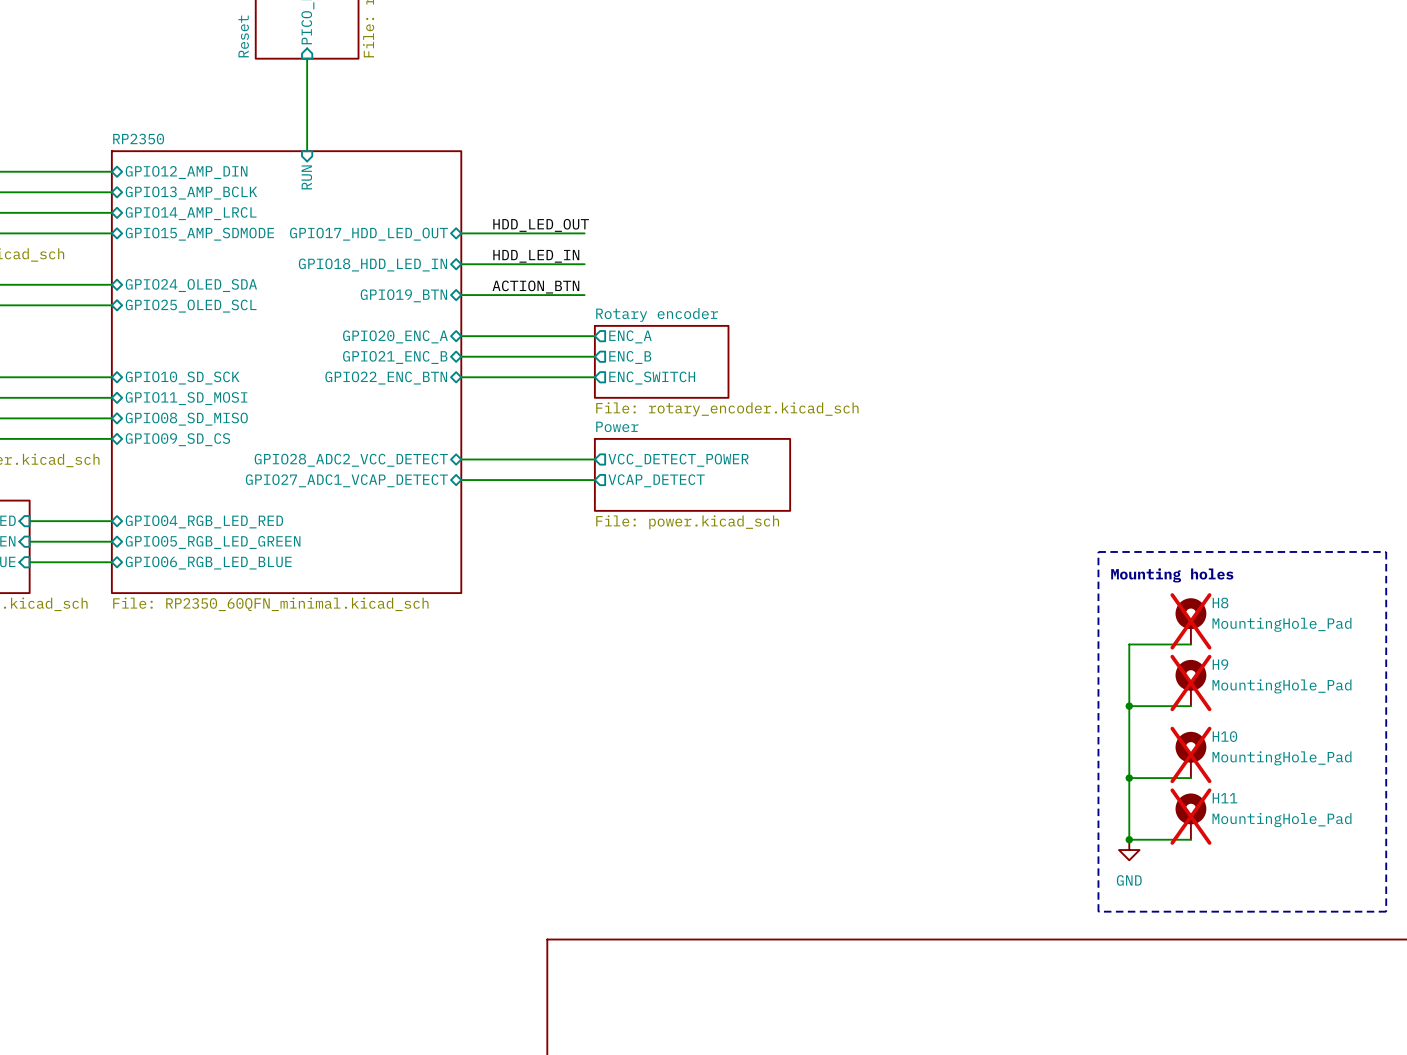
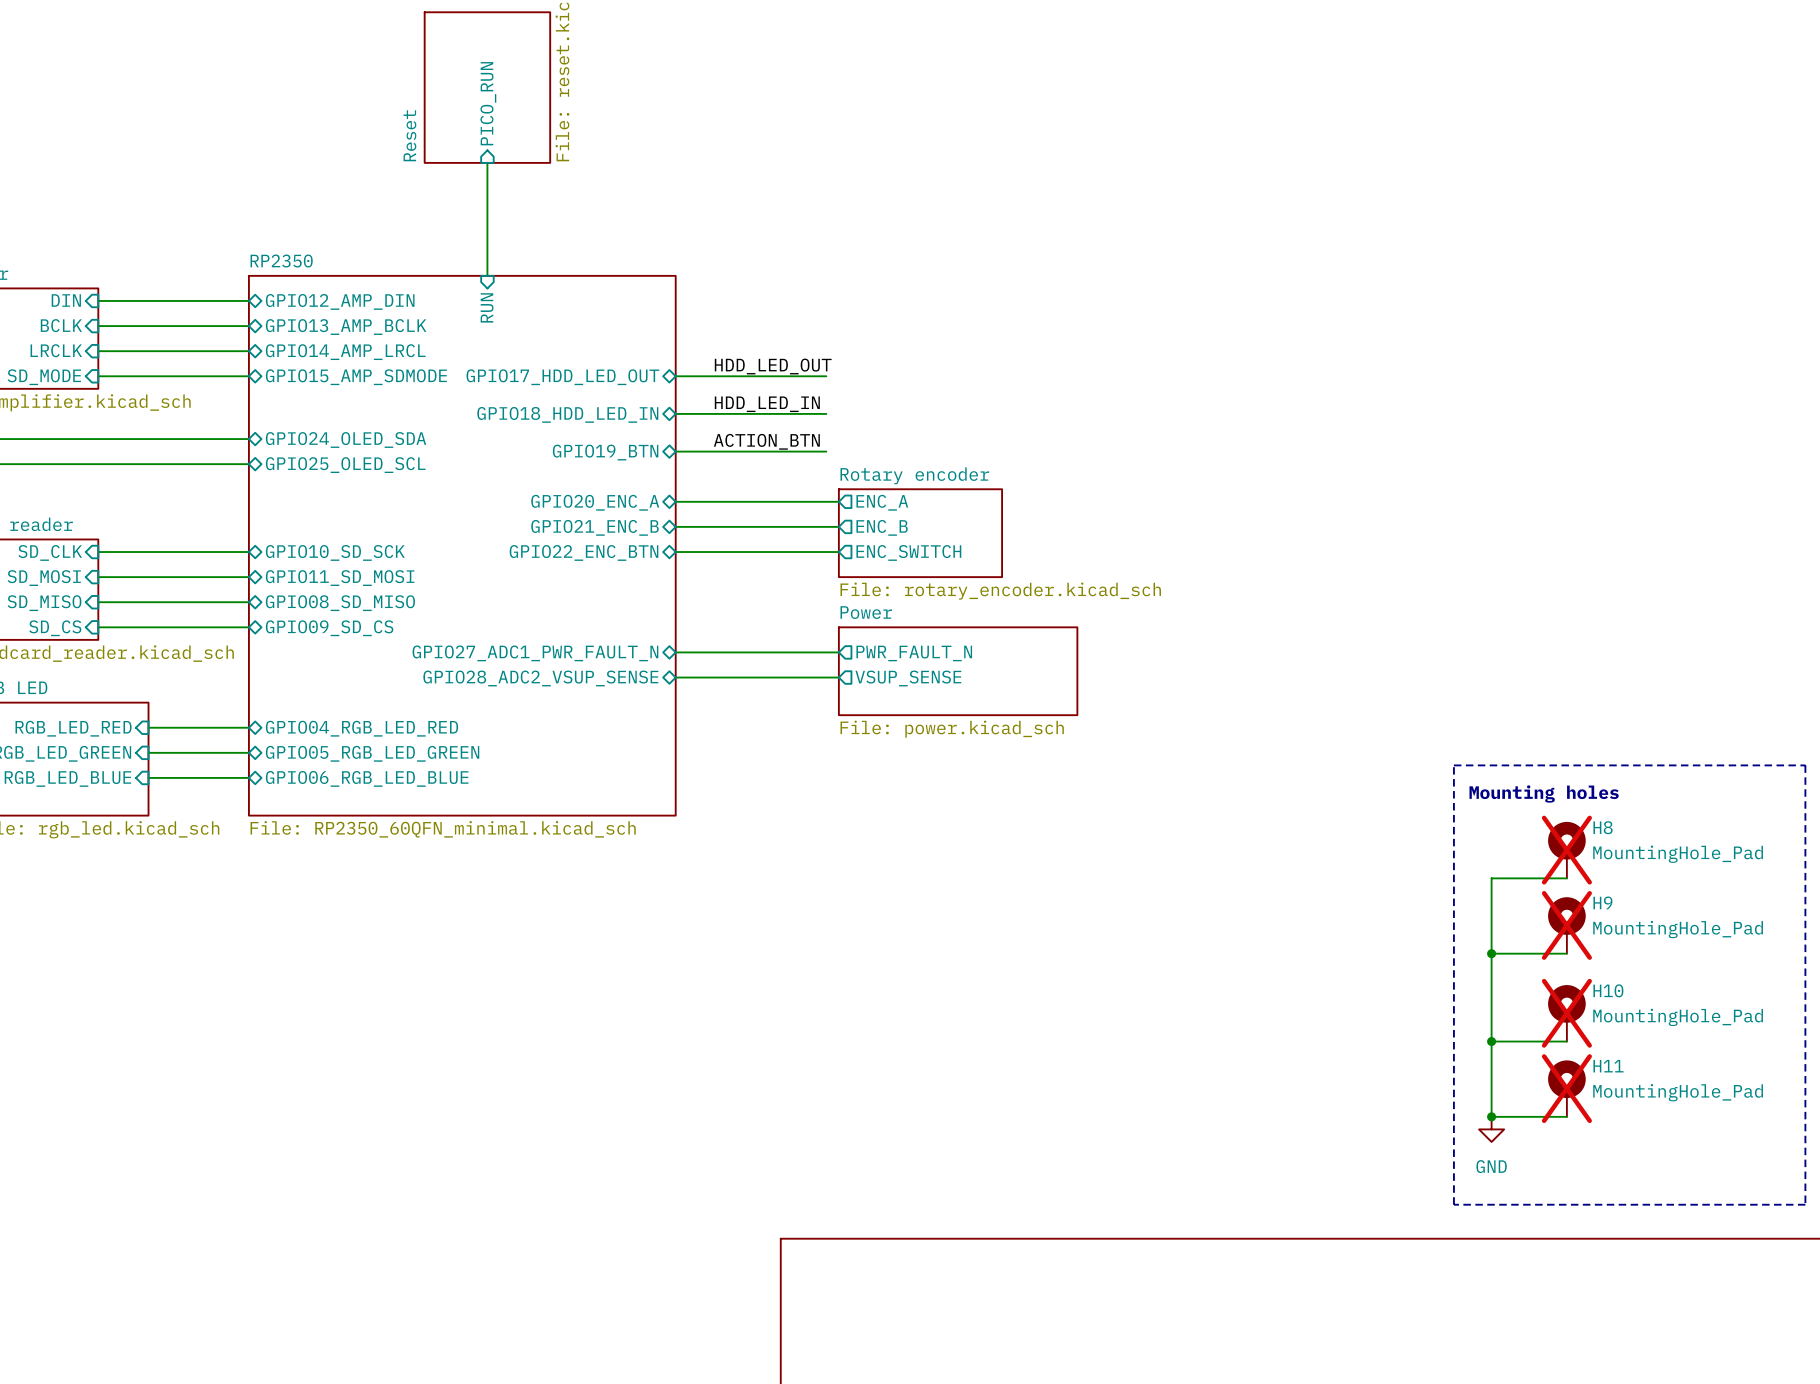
sheet pin: GPIO28_ADC2_VCC_DETECT (351, 460) -> GPIO27_ADC1_PWR_FAULT_N (535, 653)
sheet pin: VCC_DETECT_POWER (678, 460) -> PWR_FAULT_N (914, 653)
sheet pin: GPIO27_ADC1_VCAP_DETECT (346, 480) -> GPIO28_ADC2_VSUP_SENSE (540, 678)
sheet pin: VCAP_DETECT (656, 480) -> VSUP_SENSE (908, 678)

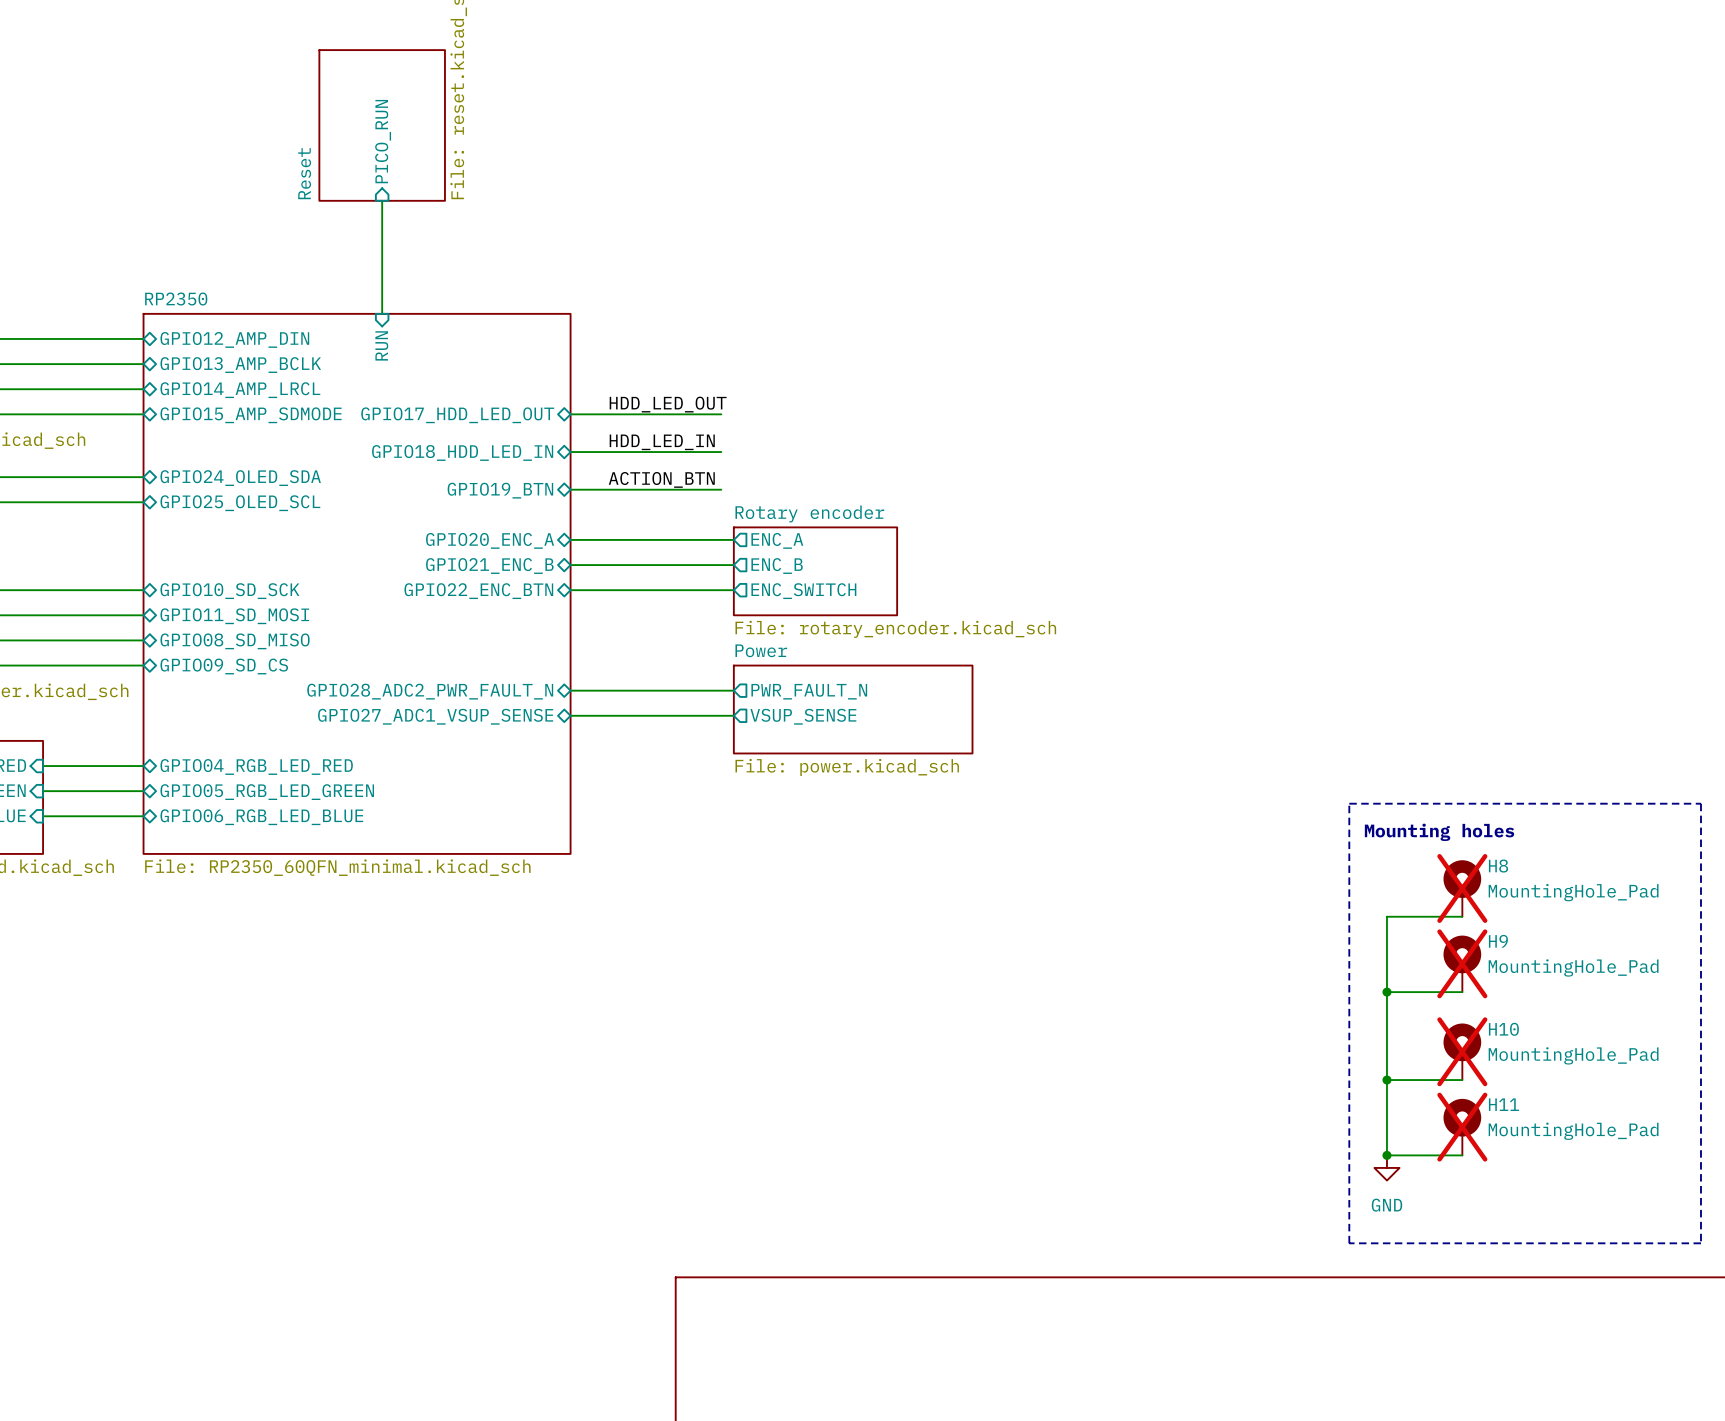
sheet pin: GPIO27_ADC1_PWR_FAULT_N (535, 653) -> GPIO28_ADC2_PWR_FAULT_N (430, 691)
sheet pin: GPIO28_ADC2_VSUP_SENSE (540, 678) -> GPIO27_ADC1_VSUP_SENSE (435, 716)

